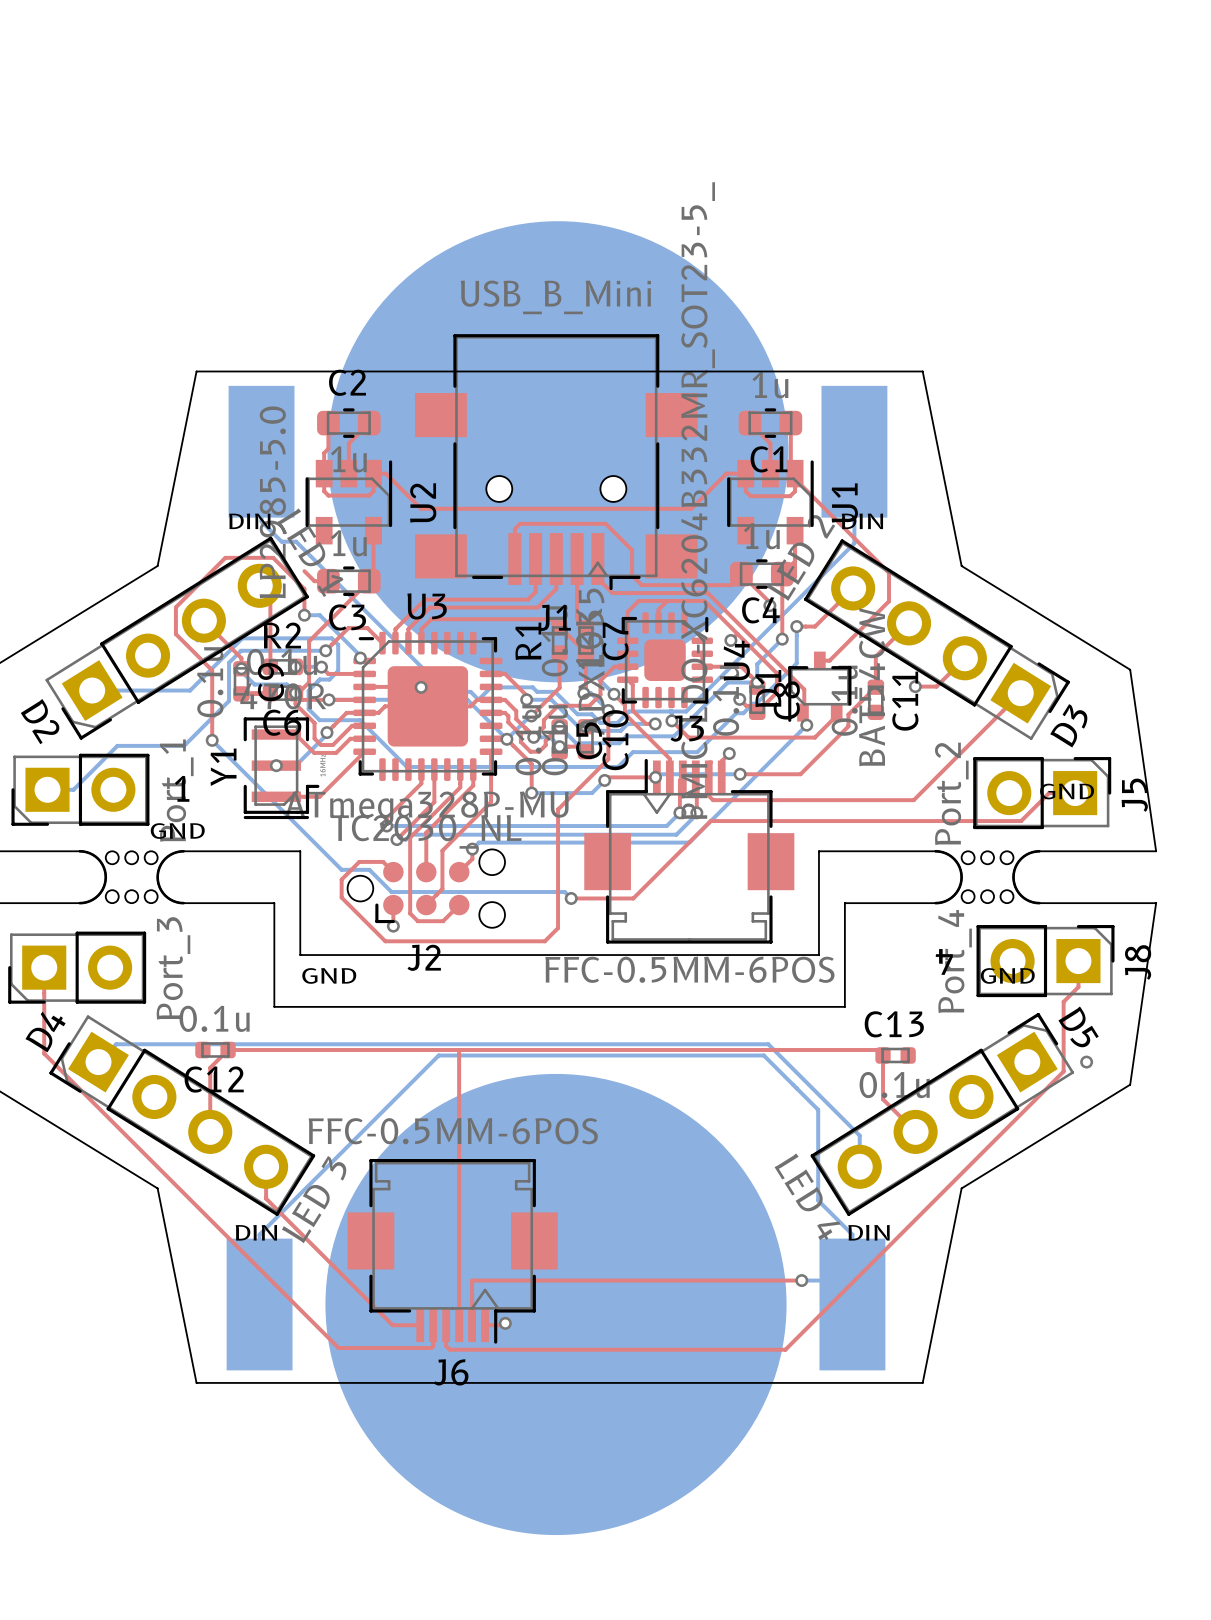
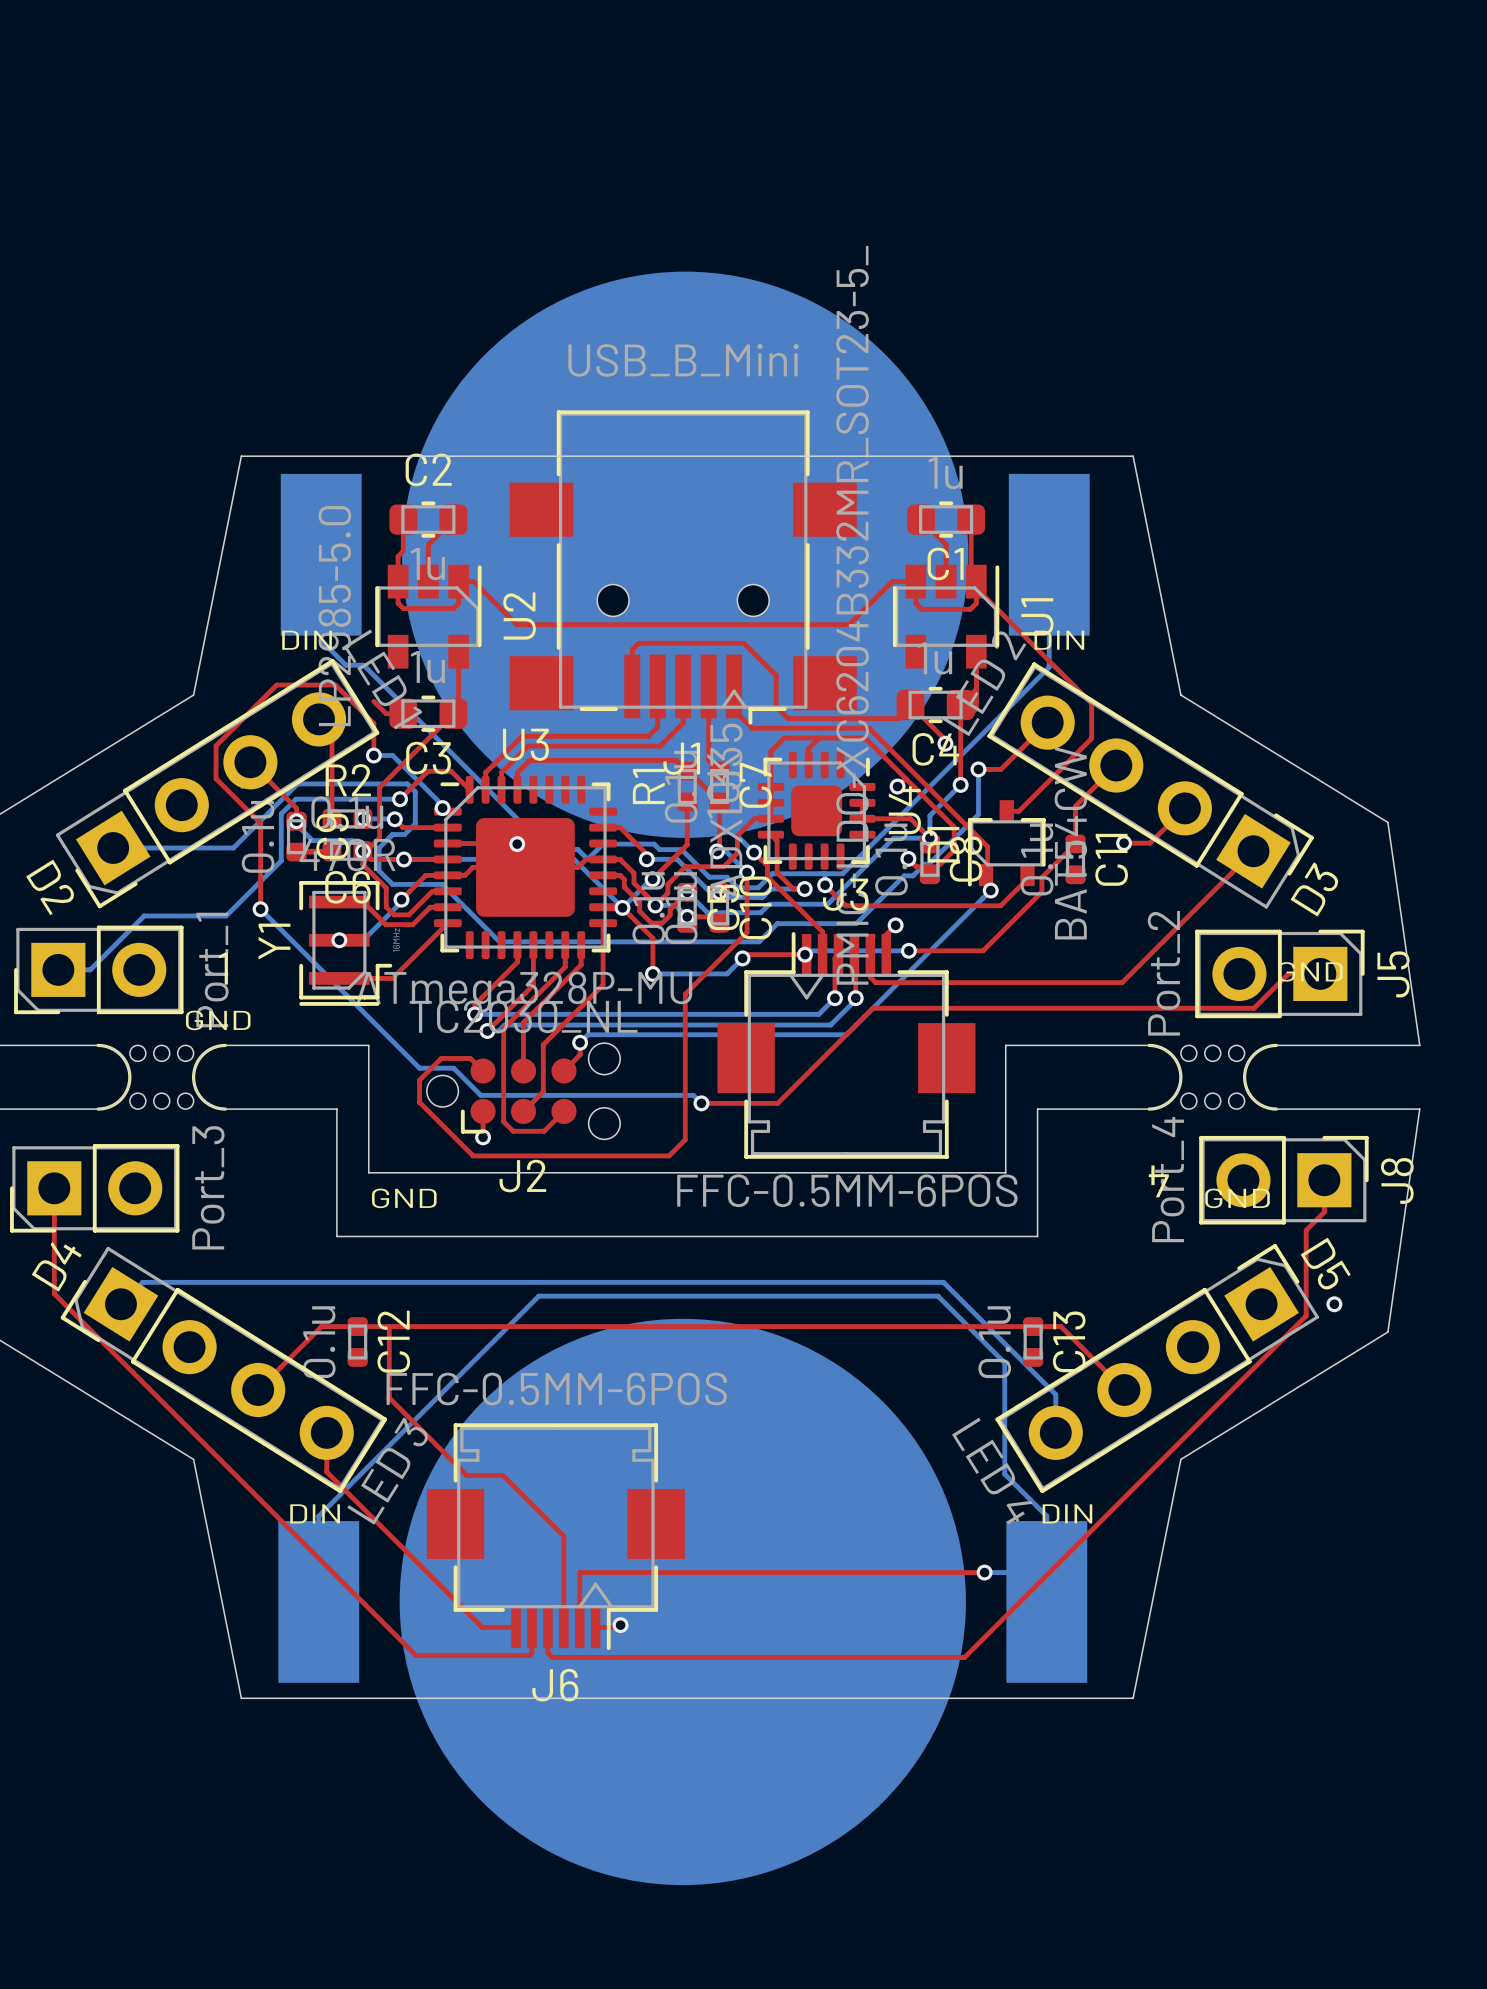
C12 rotation: 0° (215, 1049) -> 90° clockwise (357, 1342)
C12 position: (215, 1049) -> (357, 1342)
top track: (459, 1050) (459, 1251) -> (389, 1326) (389, 1397) (466, 1475) (503, 1475) (563, 1536)
C13 rotation: 0° (895, 1055) -> 90° clockwise (1033, 1342)
C13 position: (895, 1055) -> (1033, 1342)
top track: (883, 1099) (883, 1055) (877, 1049) (228, 1049) (210, 1067) (210, 1131) -> (1084, 1349) (1060, 1326) (321, 1326) (258, 1390)

